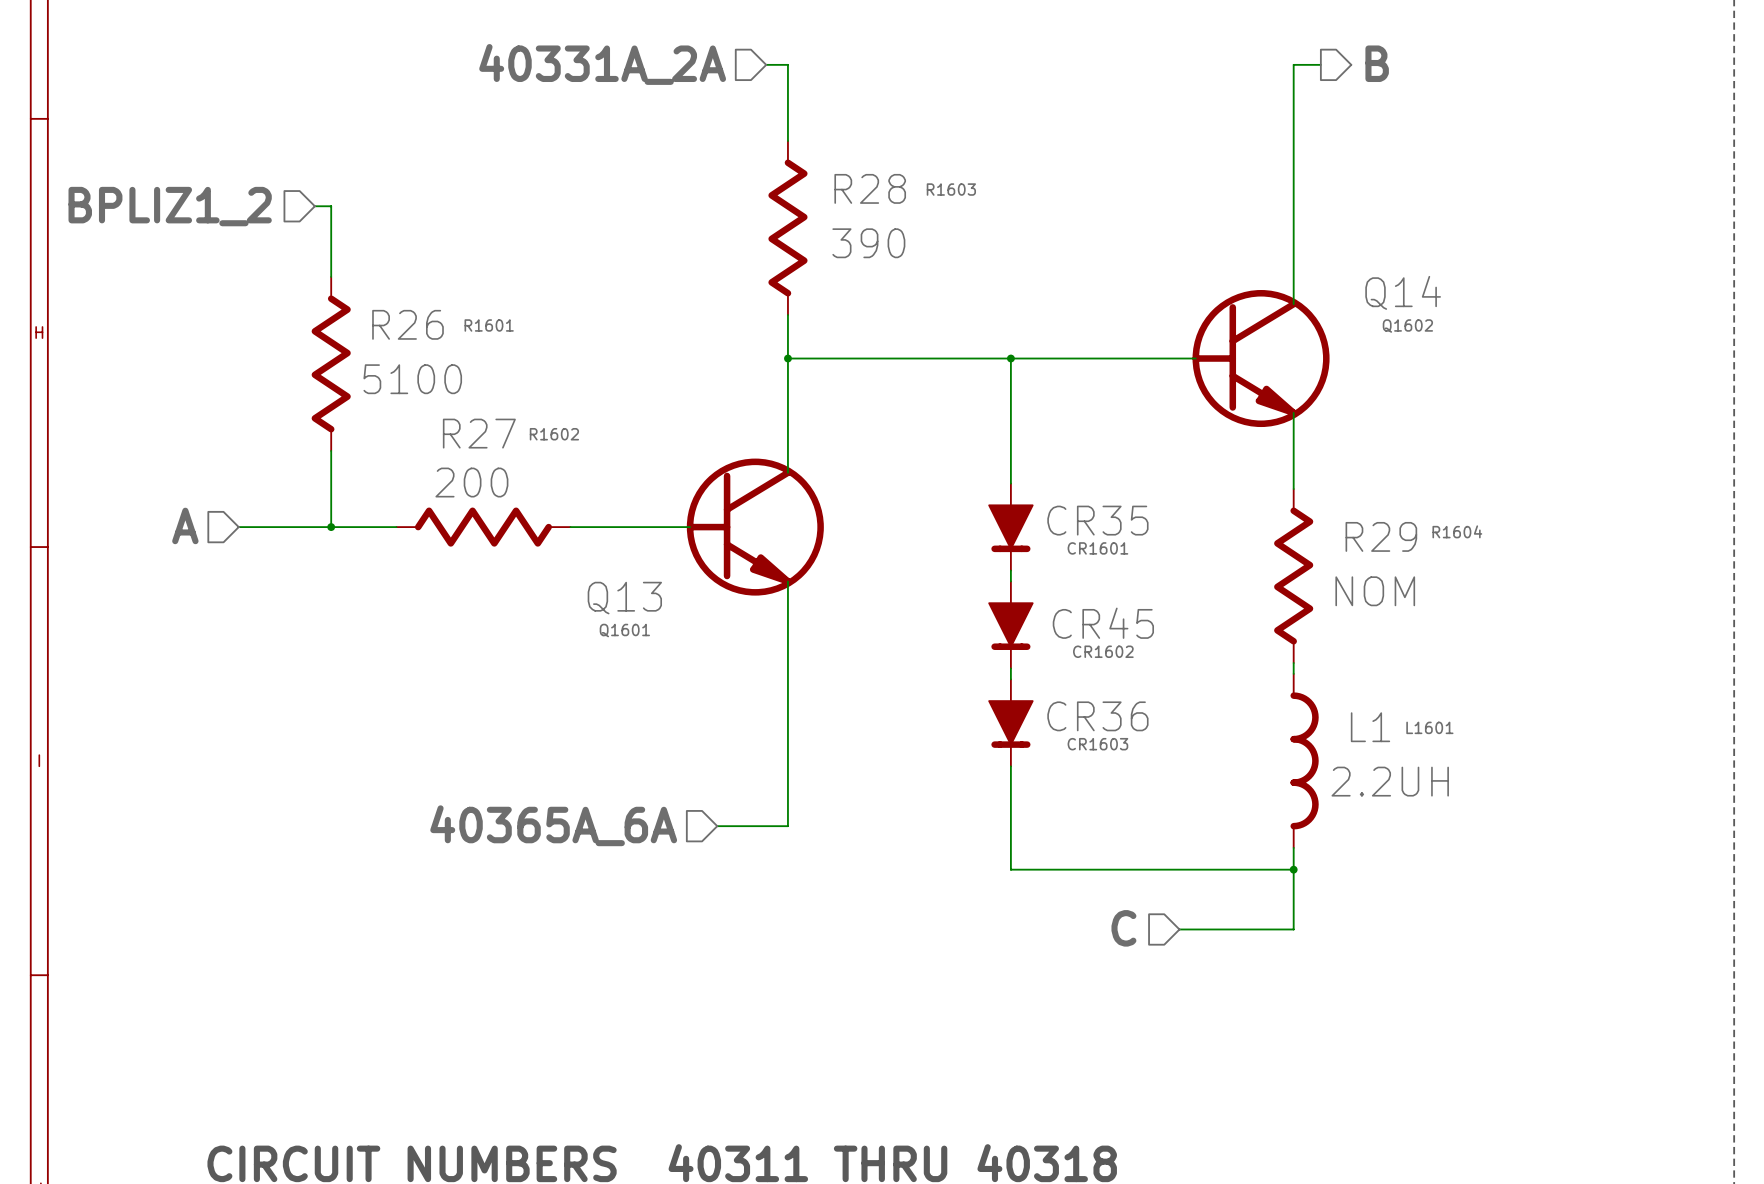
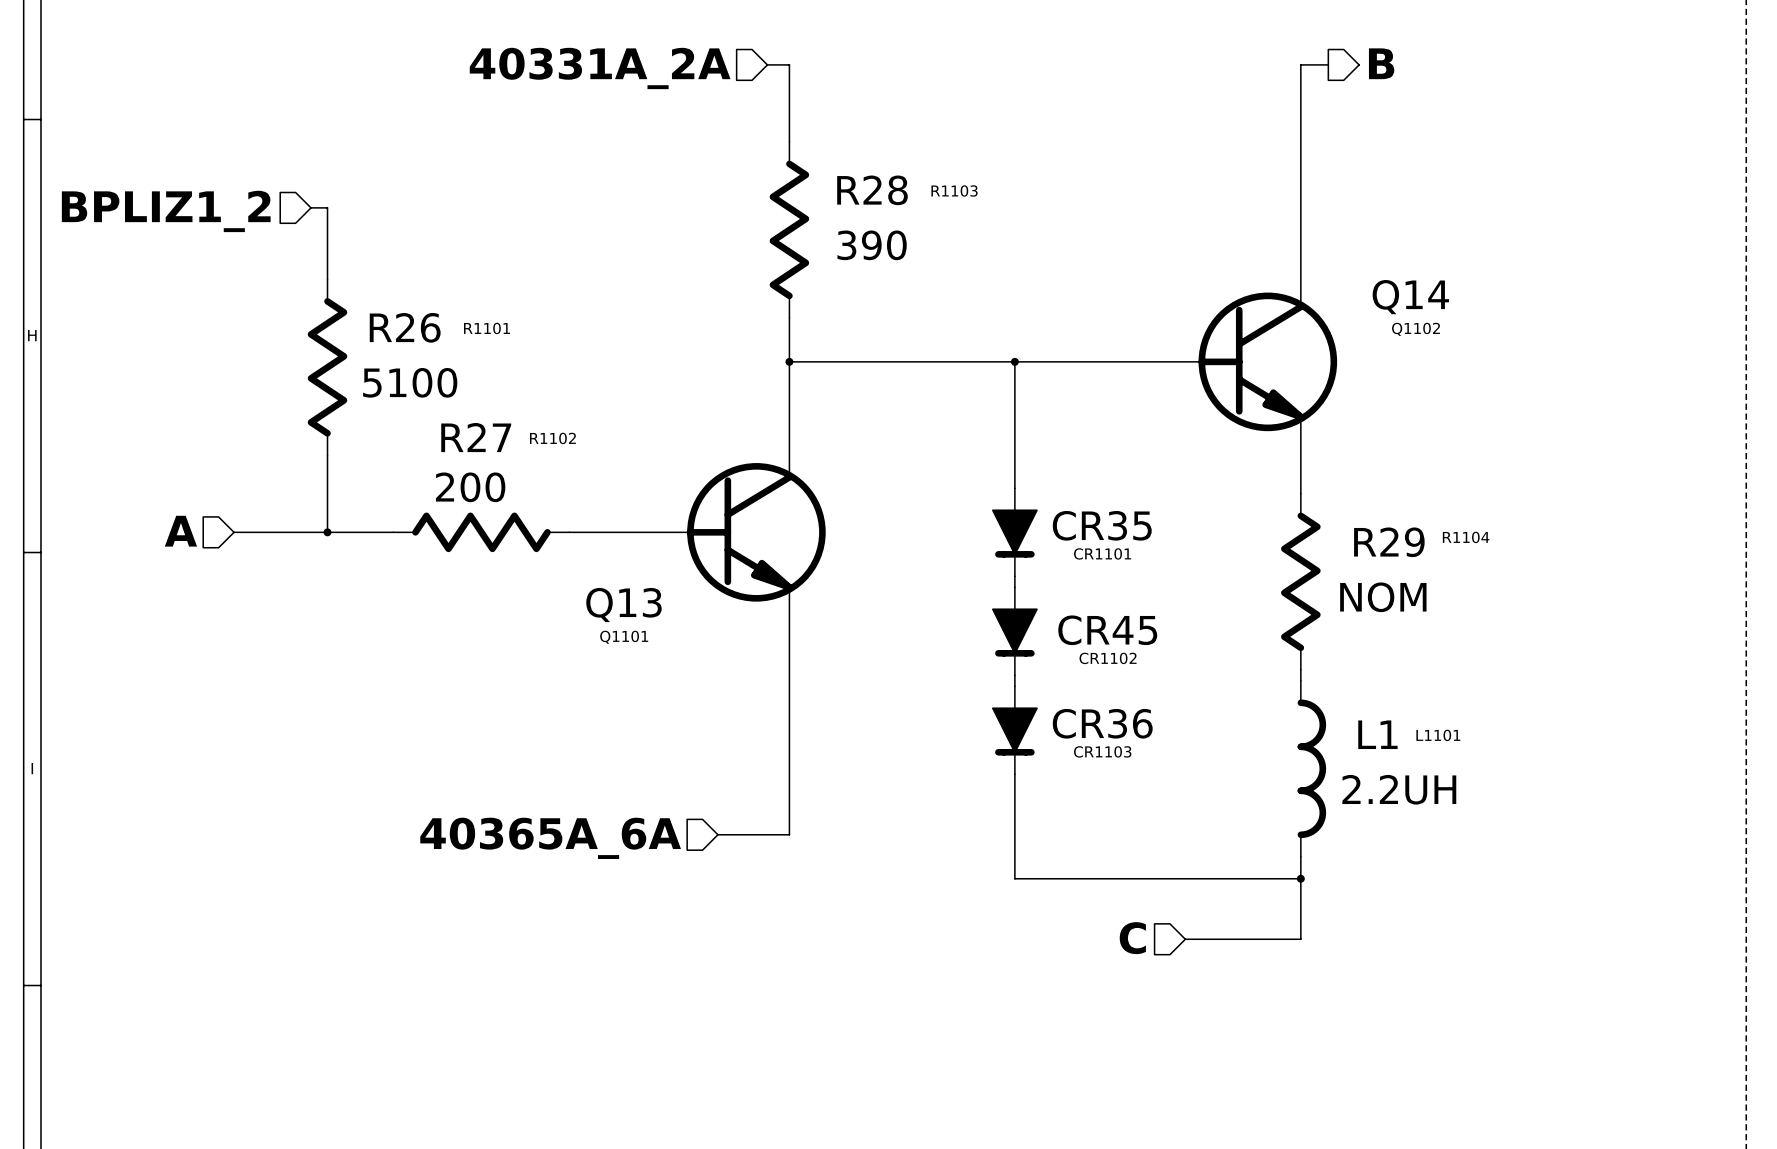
R1603 name: R1603 (951, 189) -> R1103 (954, 190)
R1601 name: R1601 (489, 325) -> R1101 (487, 328)
Q1602 name: Q1602 (1407, 326) -> Q1102 (1415, 329)
R1602 name: R1602 (554, 434) -> R1102 (552, 438)
R1604 name: R1604 (1457, 531) -> R1104 (1466, 537)
CR1601 name: CR1601 (1097, 548) -> CR1101 (1102, 553)
Q1601 name: Q1601 (624, 630) -> Q1101 (624, 637)
CR1602 name: CR1602 (1103, 651) -> CR1102 (1108, 658)
L1601 name: L1601 (1429, 727) -> L1101 (1438, 735)
CR1603 name: CR1603 (1097, 744) -> CR1103 (1102, 751)

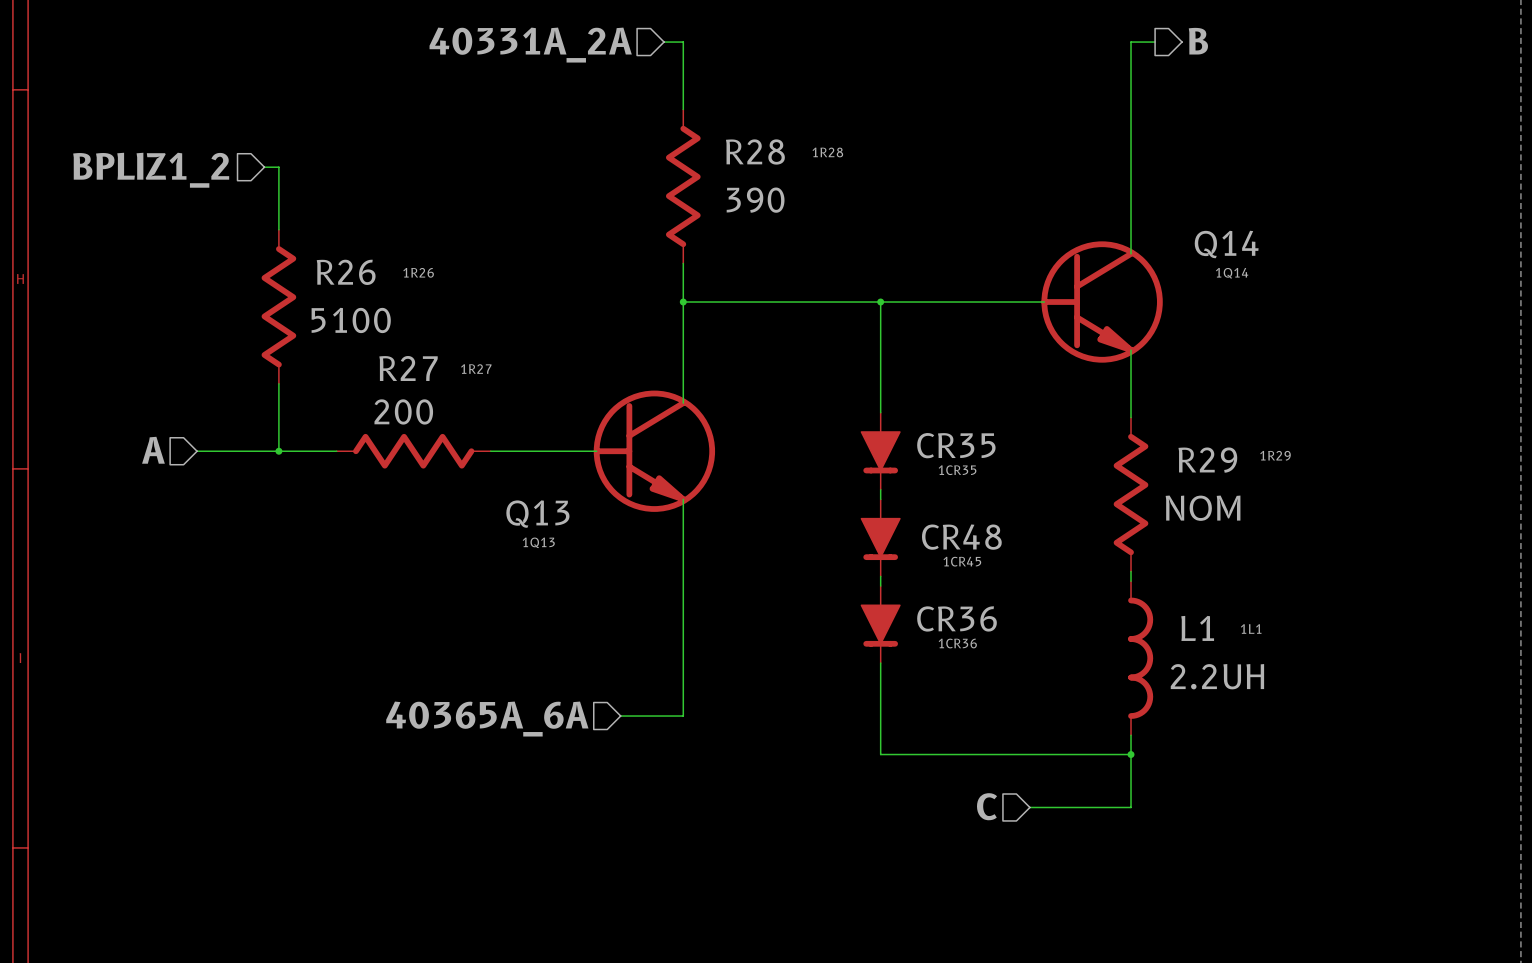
R1103 name: R1103 (954, 190) -> 1R28 (827, 152)
R1101 name: R1101 (487, 328) -> 1R26 (418, 272)
Q1102 name: Q1102 (1415, 329) -> 1Q14 (1232, 273)
R1102 name: R1102 (552, 438) -> 1R27 (476, 369)
R1104 name: R1104 (1466, 537) -> 1R29 (1275, 455)
CR1101 name: CR1101 (1102, 553) -> 1CR35 (957, 470)
CR1102 text: CR45 (1107, 630) -> CR48 (961, 537)
Q1101 name: Q1101 (624, 637) -> 1Q13 (538, 542)
CR1102 name: CR1102 (1108, 658) -> 1CR45 (962, 561)
L1101 name: L1101 (1438, 735) -> 1L1 (1251, 629)
CR1103 name: CR1103 (1102, 751) -> 1CR36 (957, 643)

